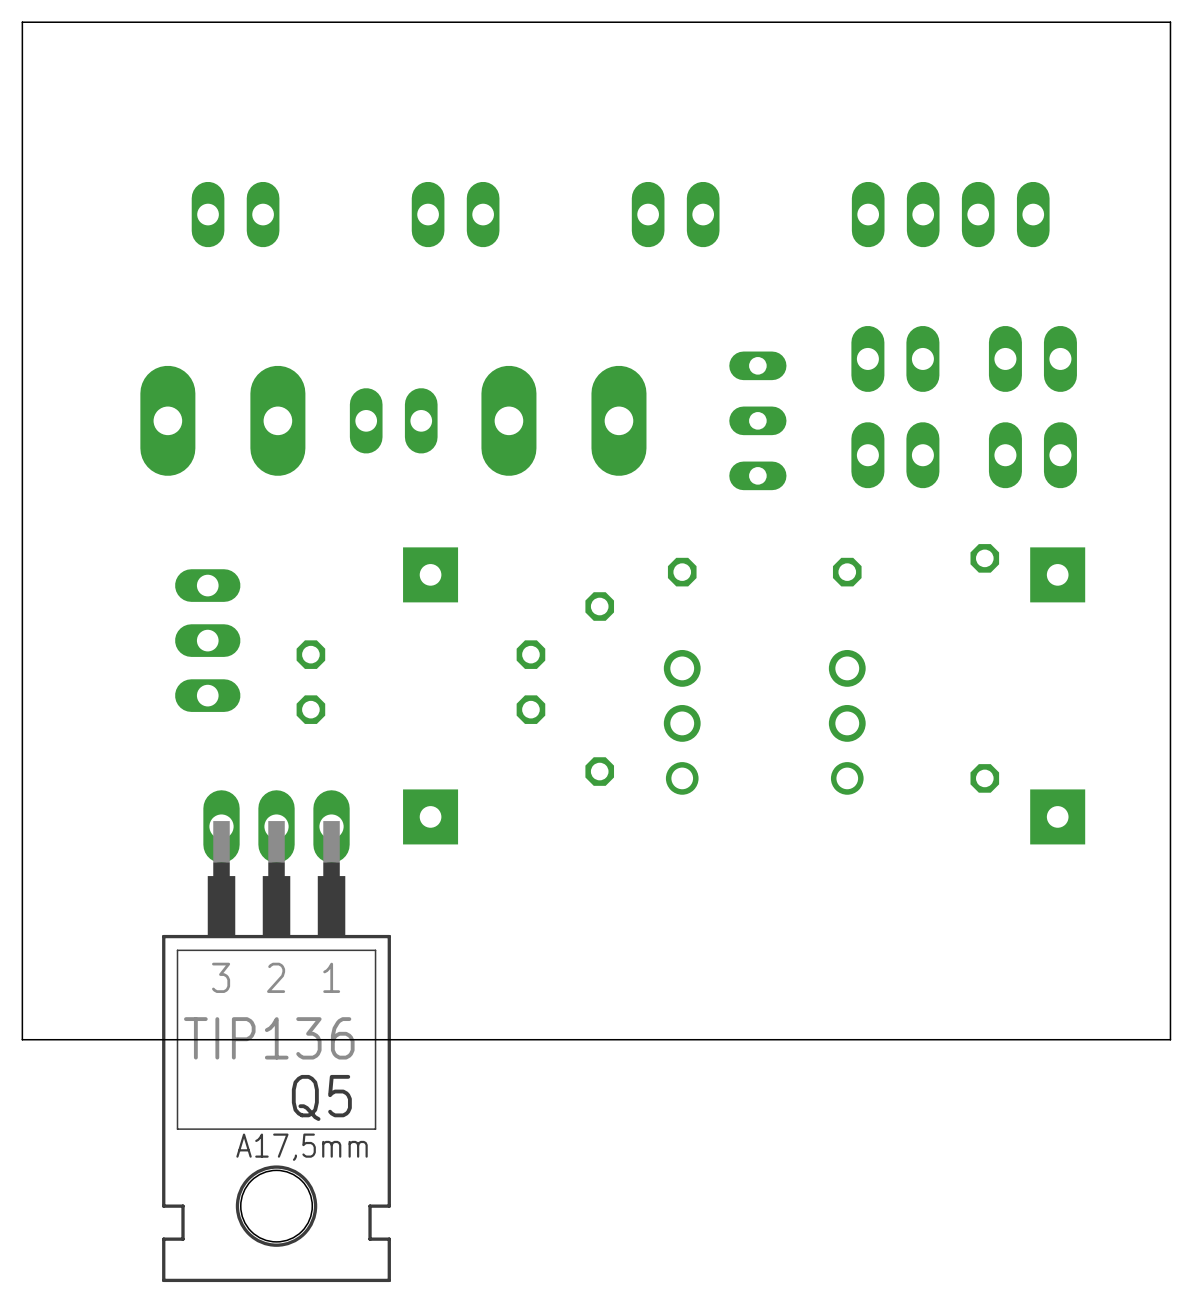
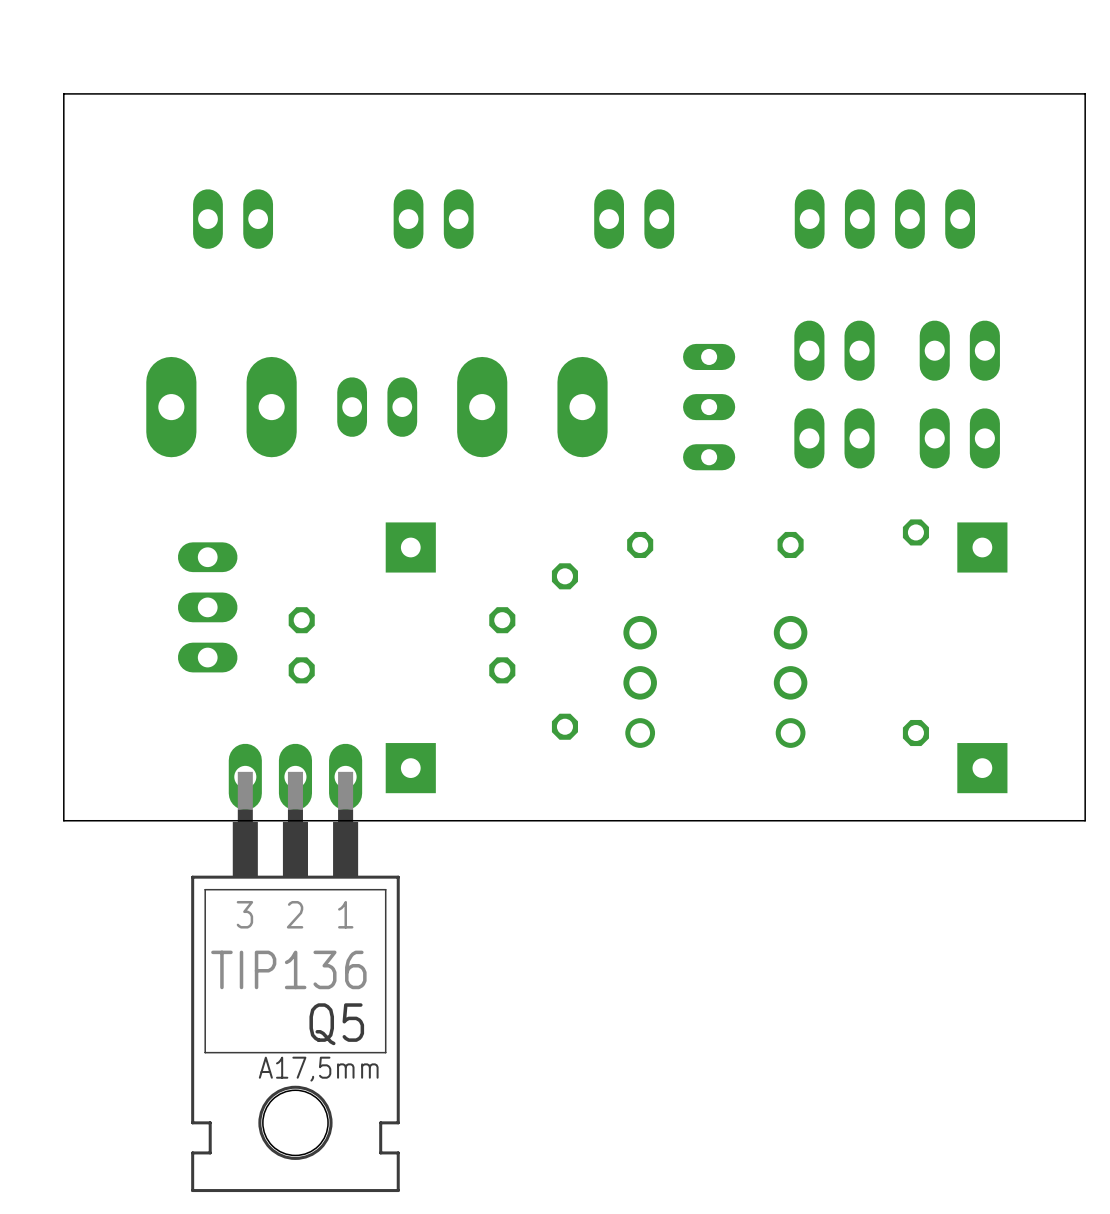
board edge: (1170, 77) (1170, 22) (22, 22) (22, 1039) (1170, 1039) (1170, 874) -> (1085, 93) (63, 93) (63, 820) (1085, 820)
Q5 position: (276, 1036) -> (295, 967)

